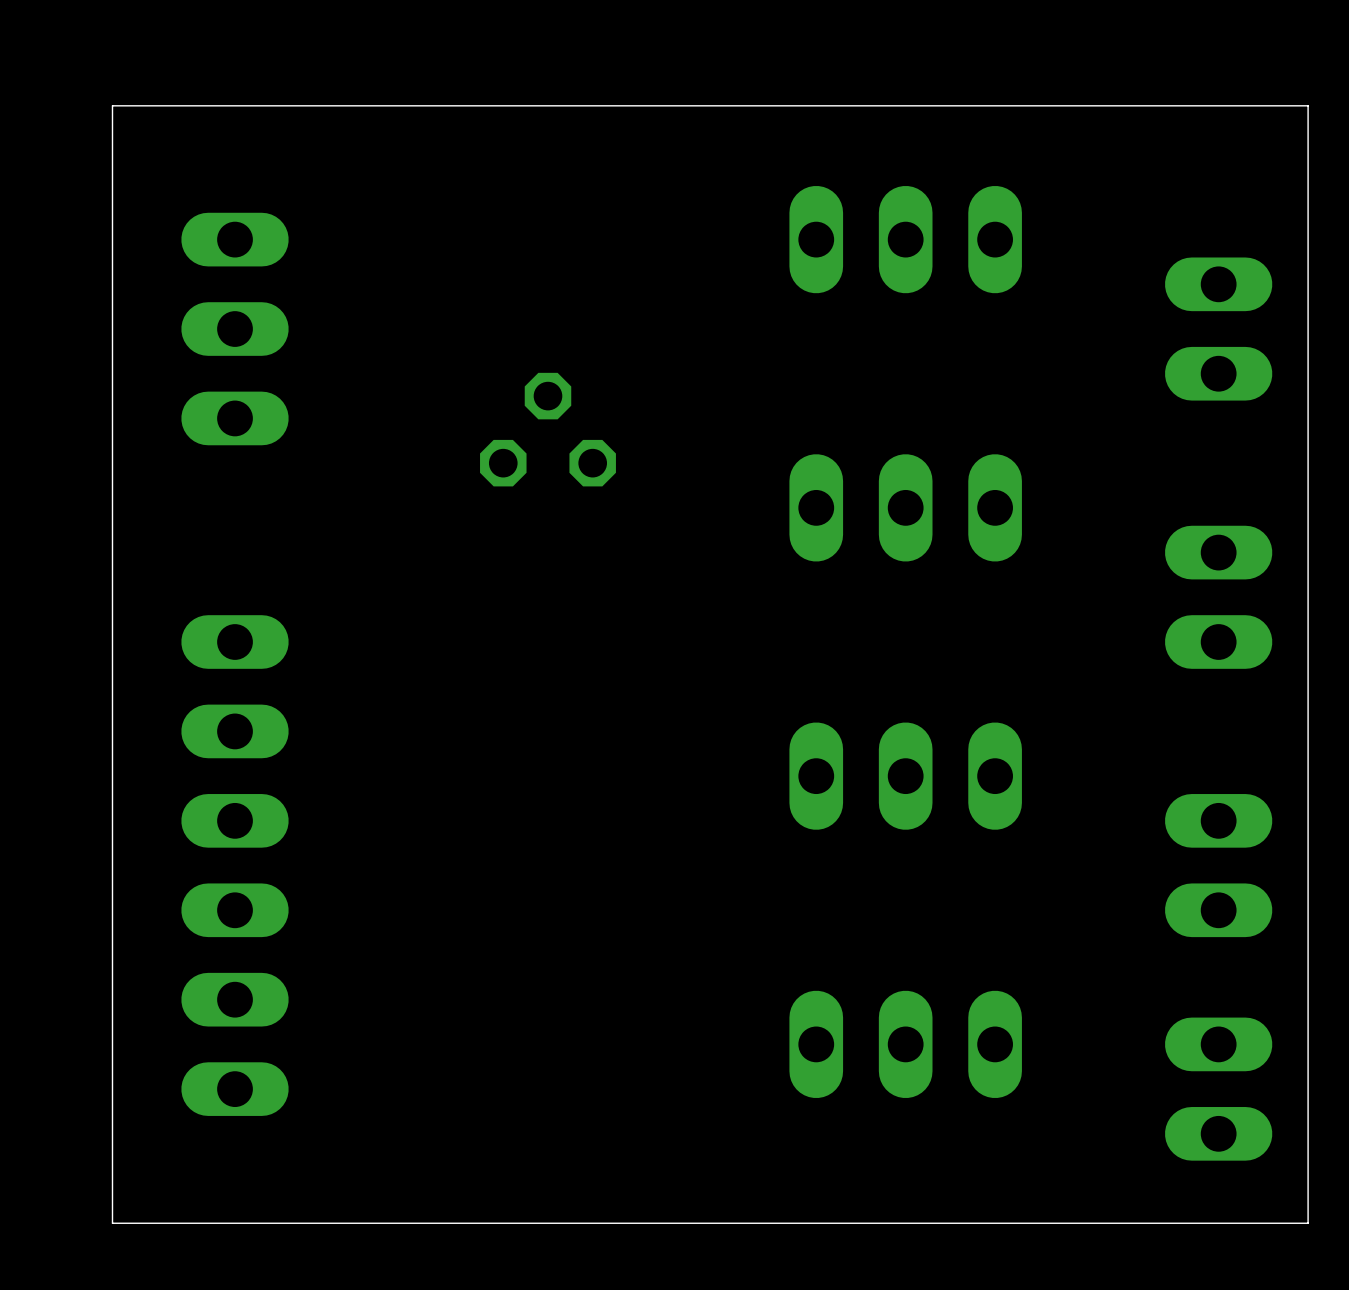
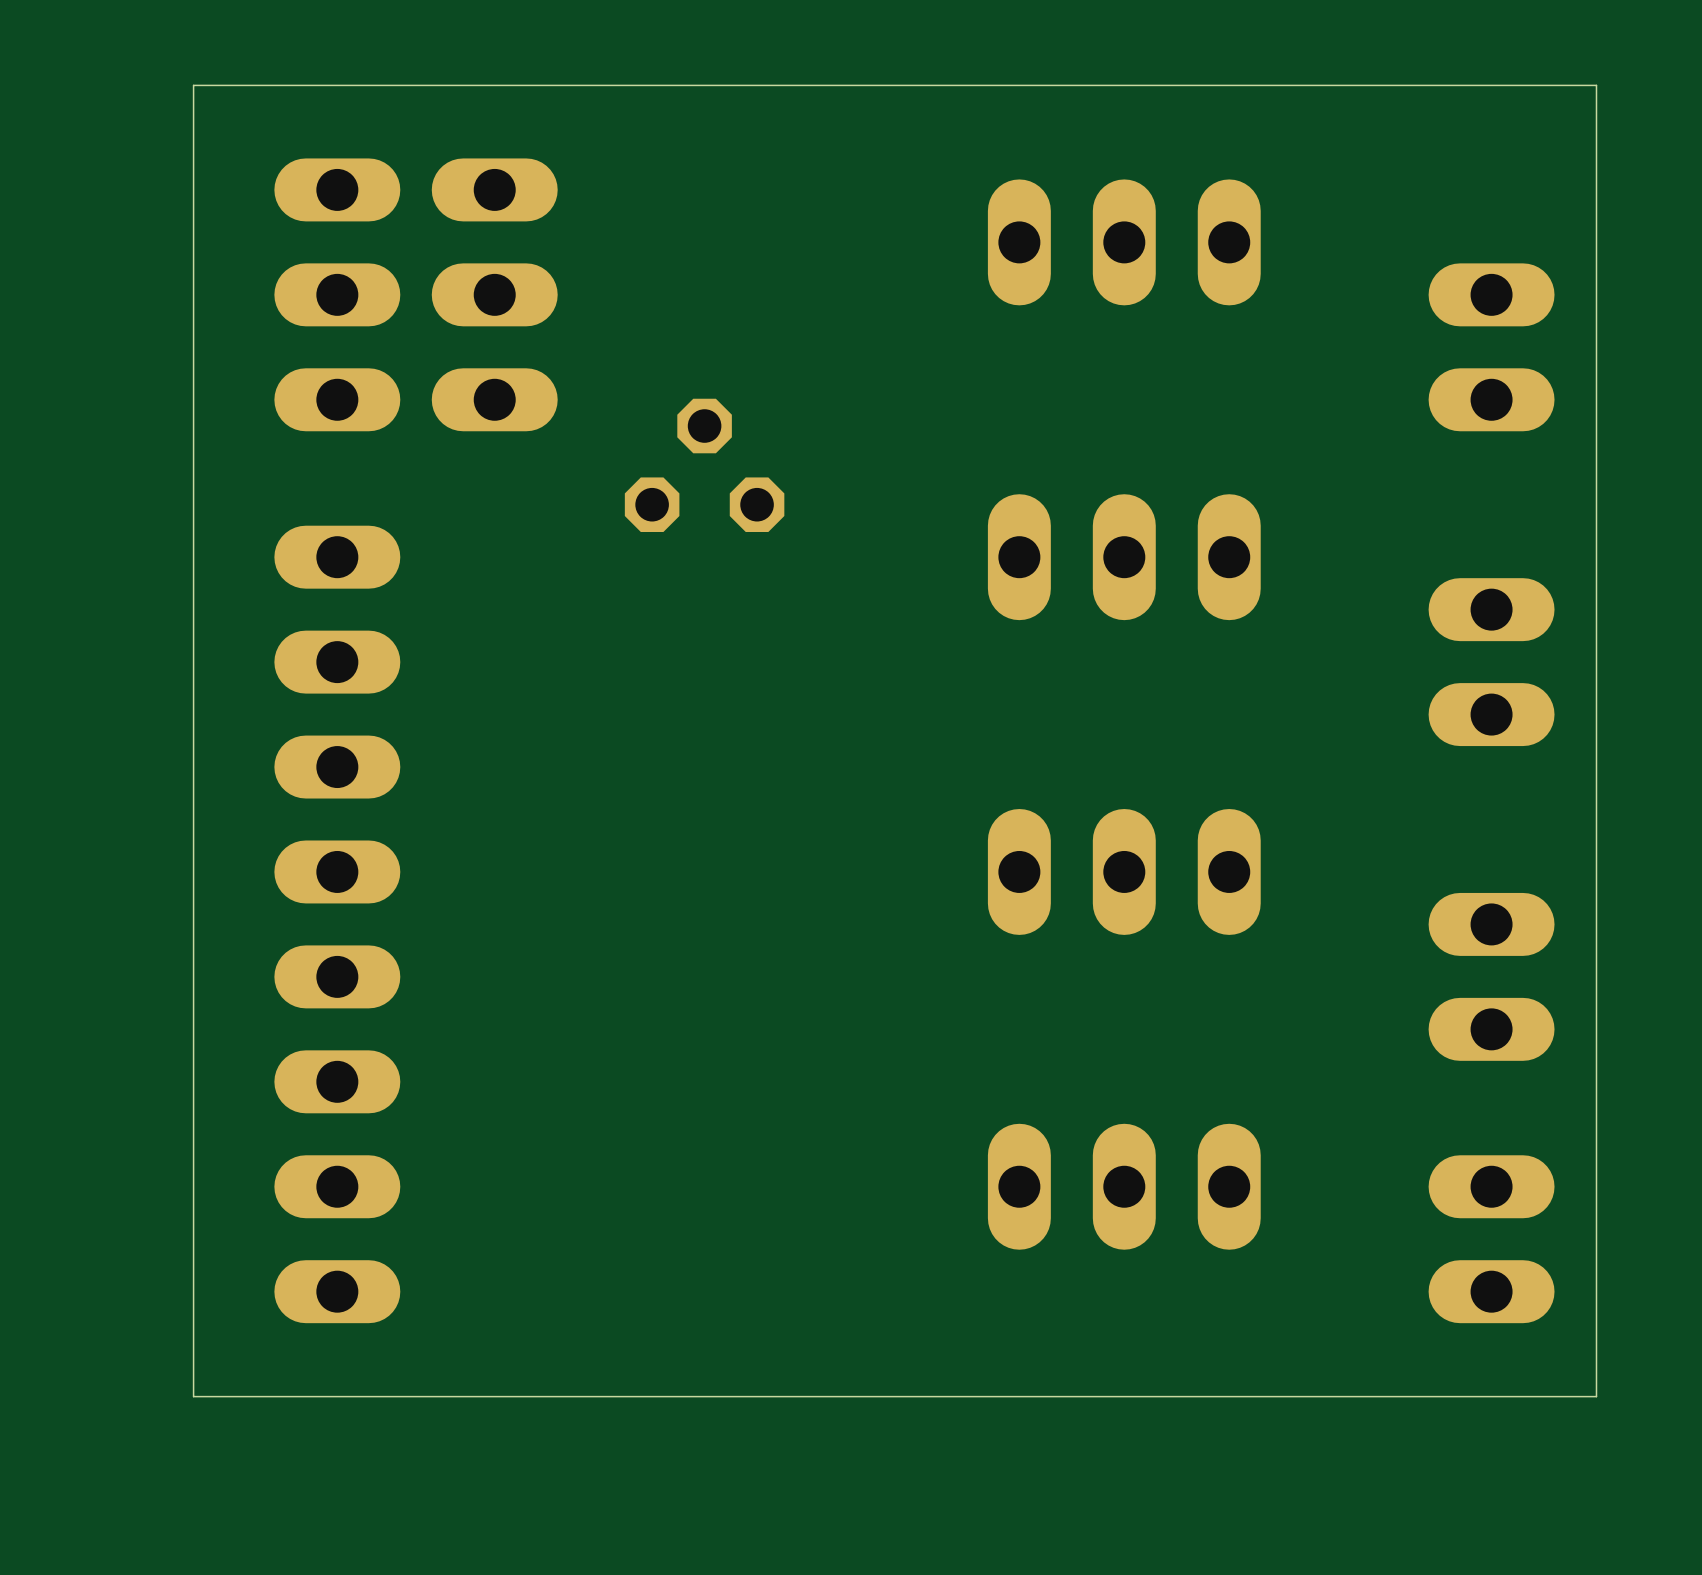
part: none -> (494, 294)
part position: (235, 329) -> (337, 294)
part: none -> (337, 924)
part: (235, 865) -> none

